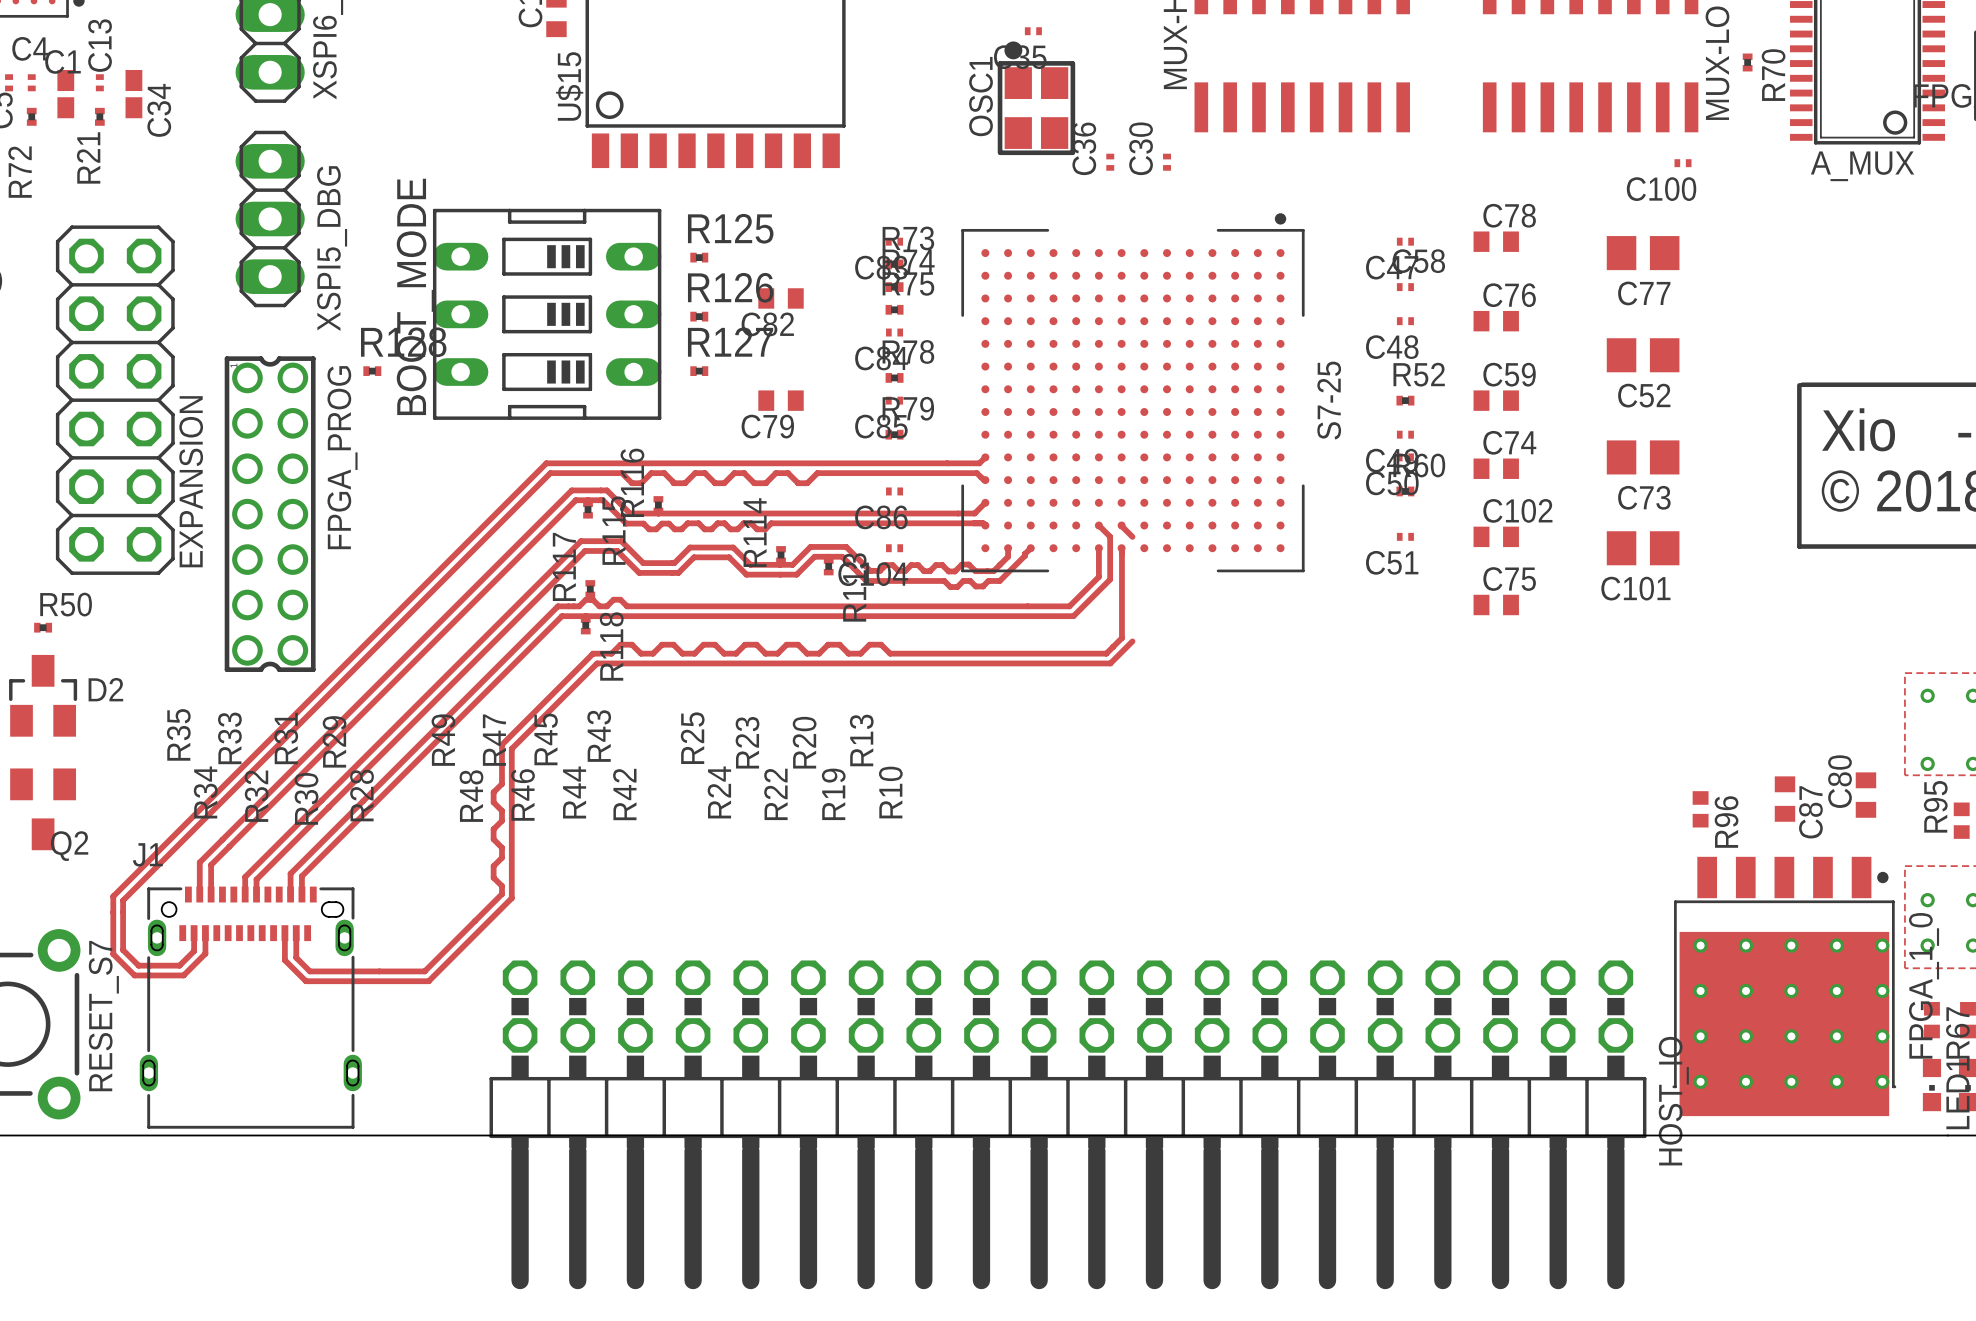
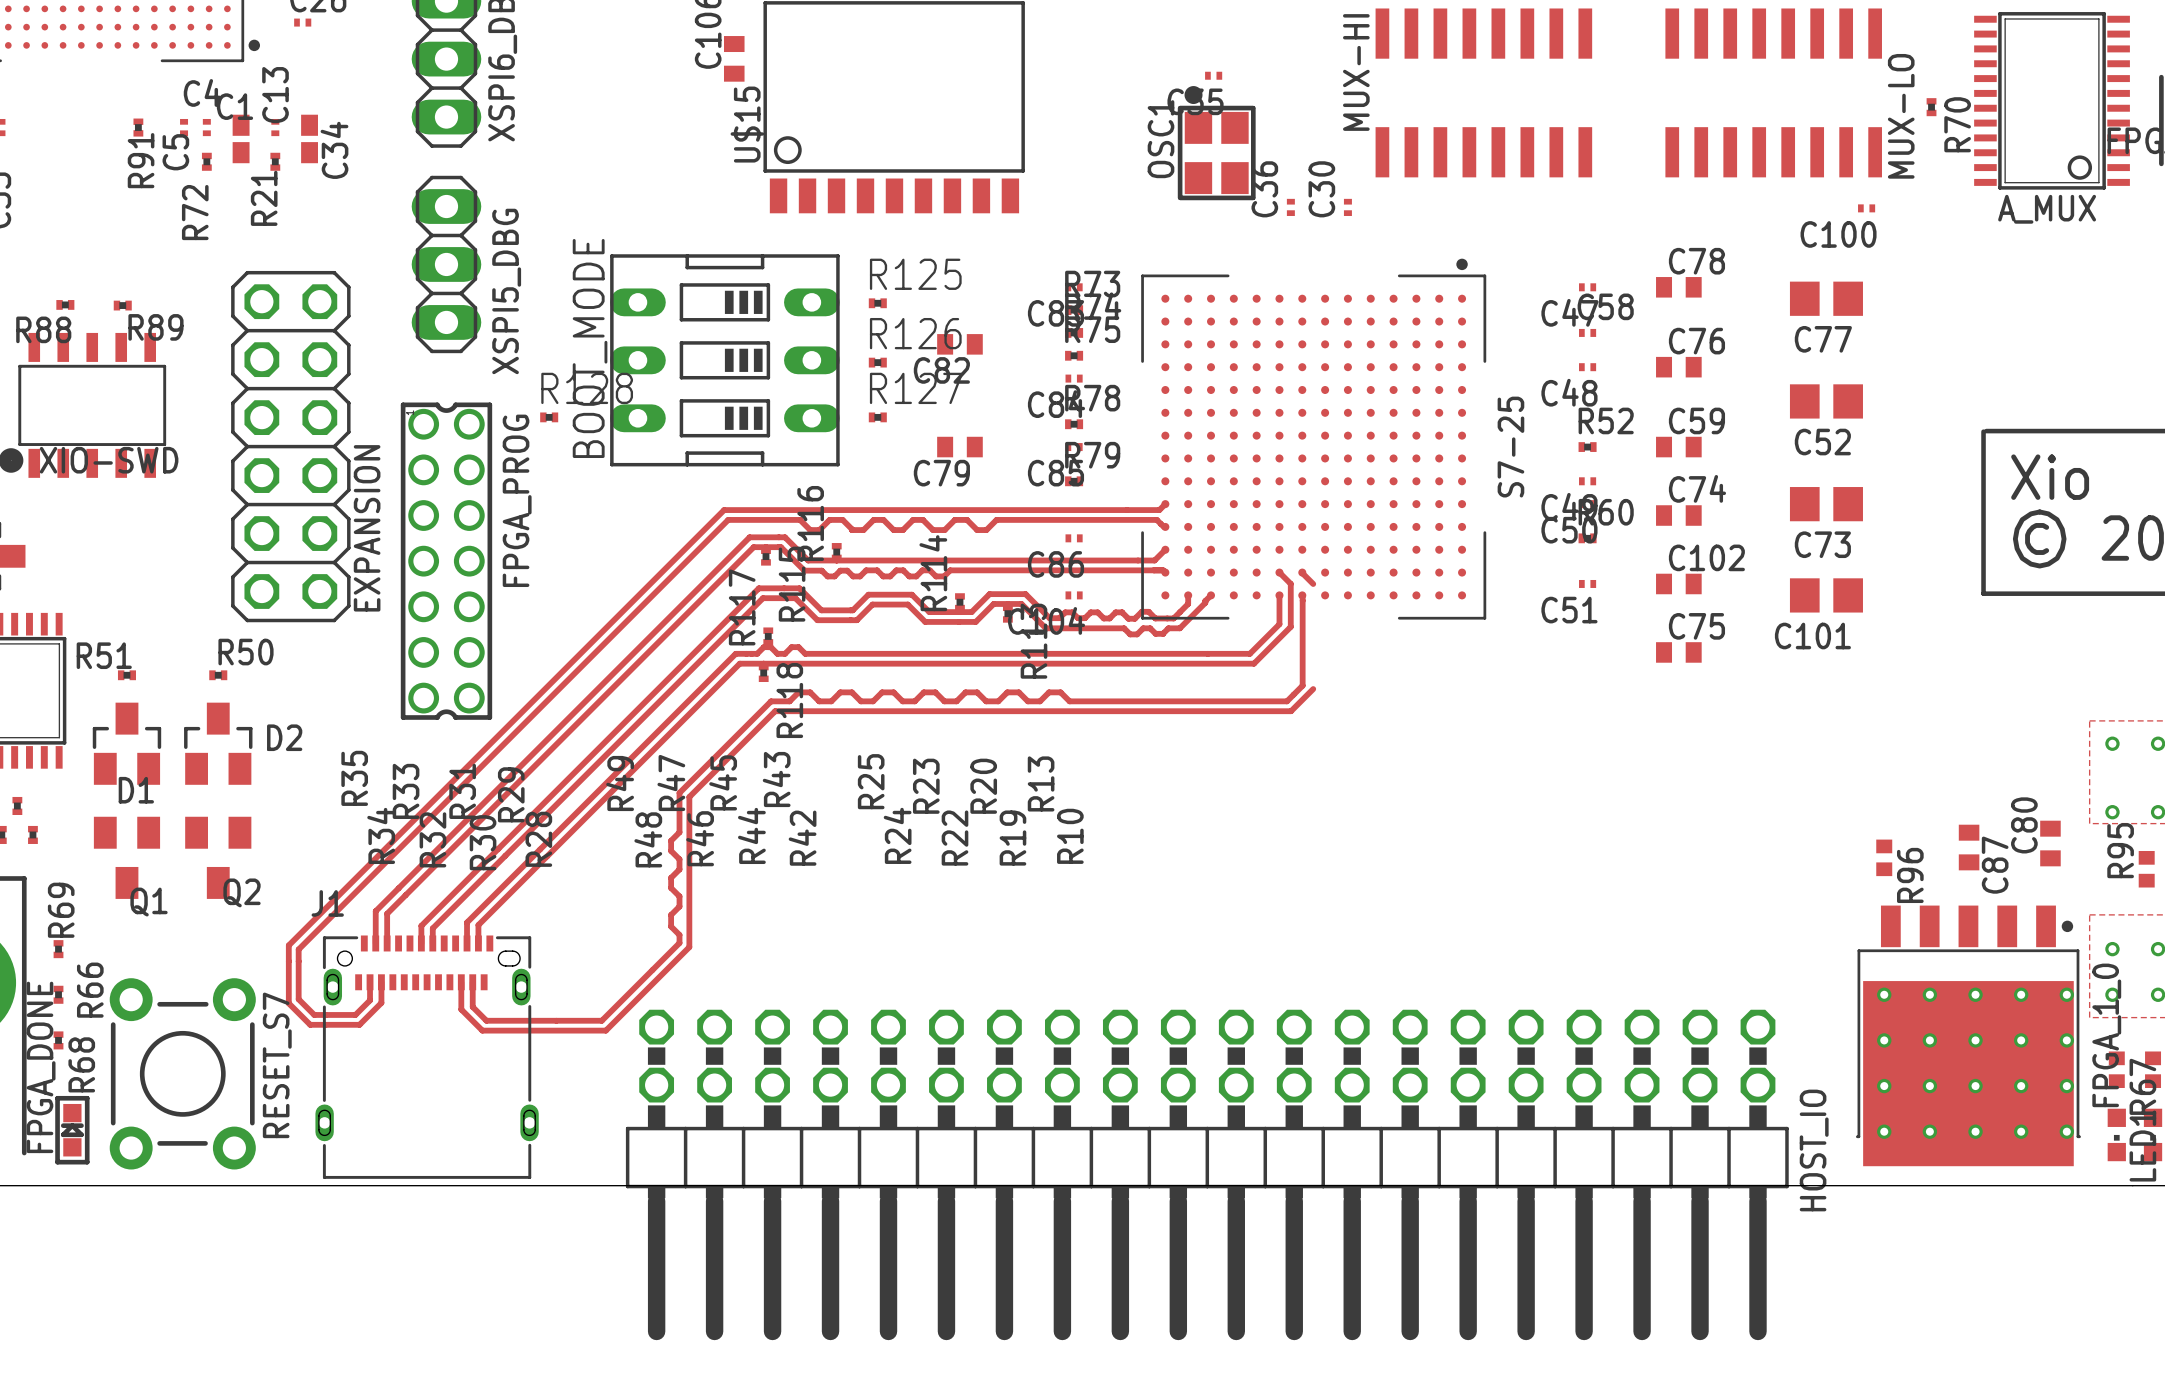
HOST_IO position: (1067, 1124) -> (1207, 1174)

